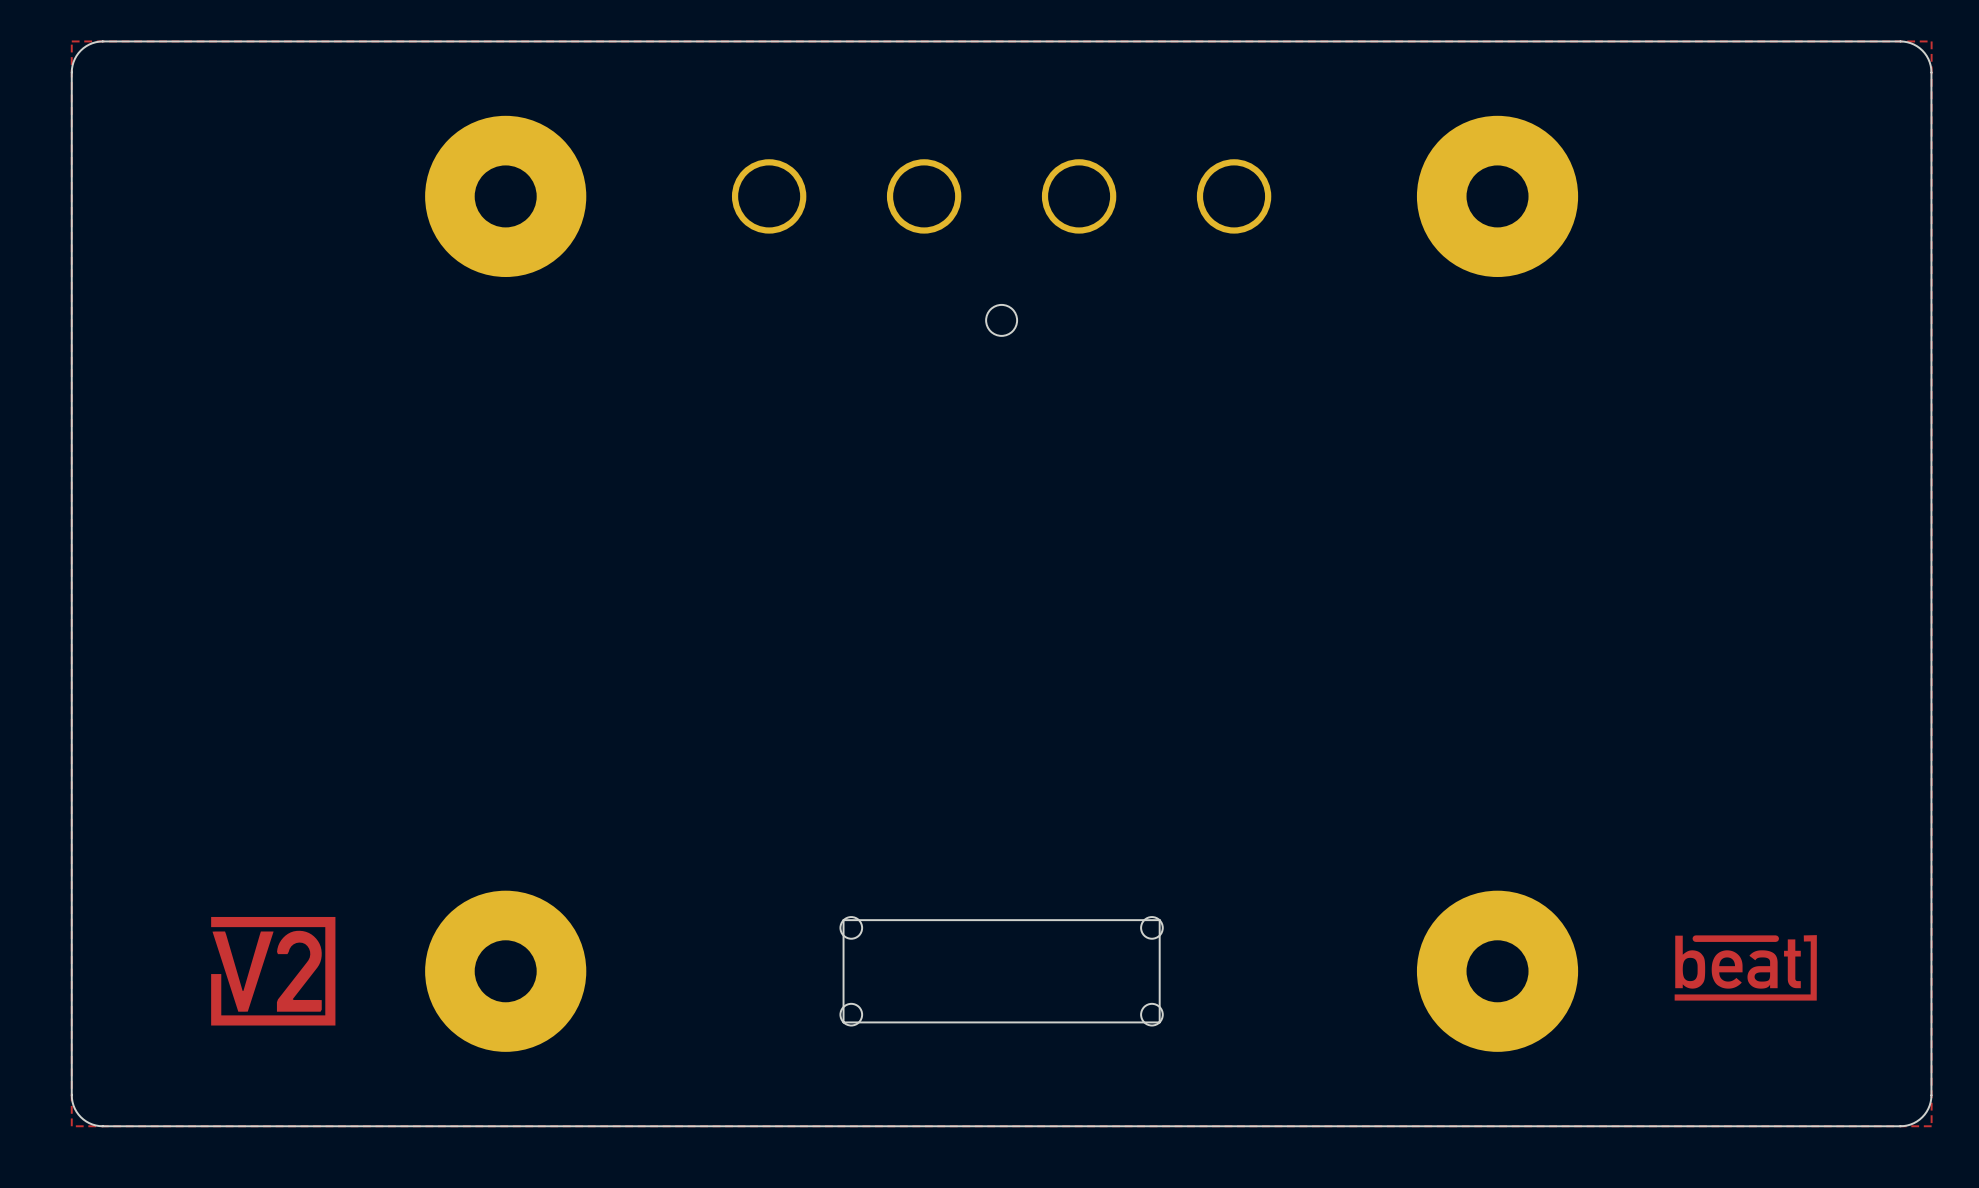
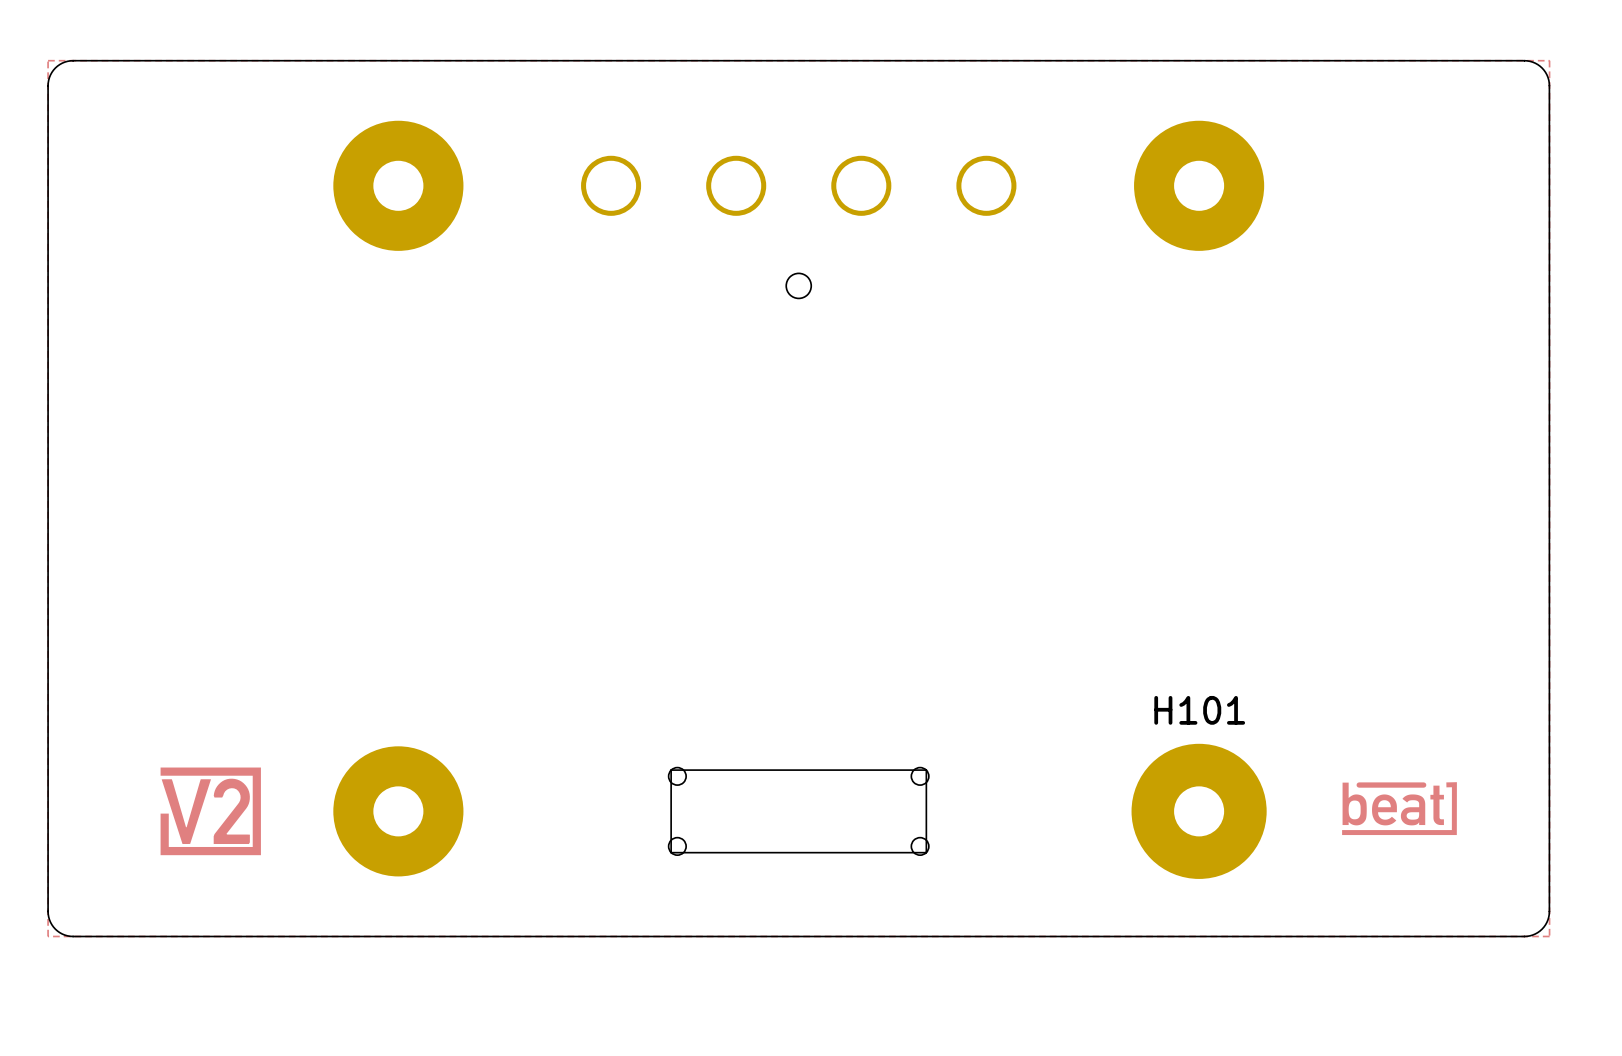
part: (1497, 971) -> none
H101: none -> (1199, 811)

